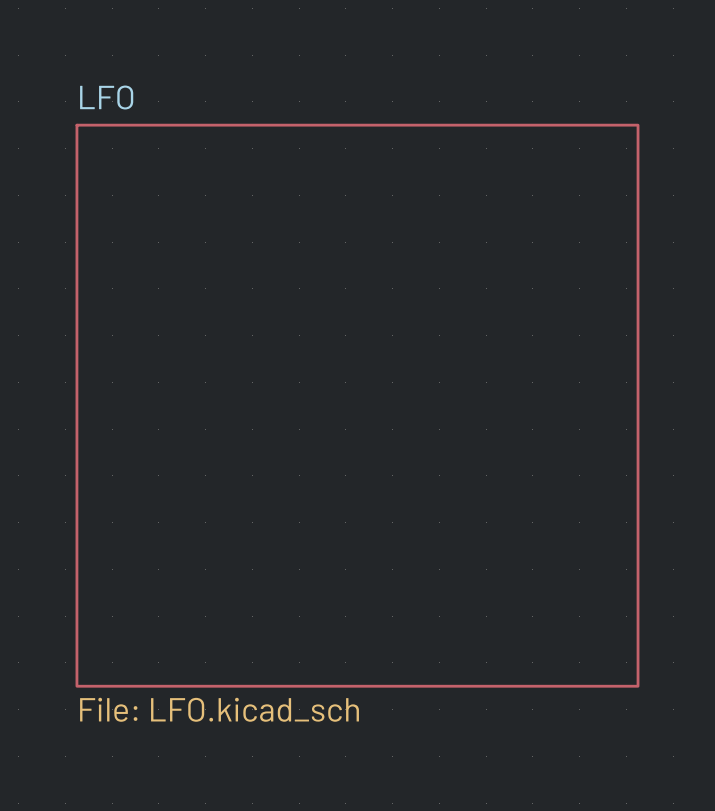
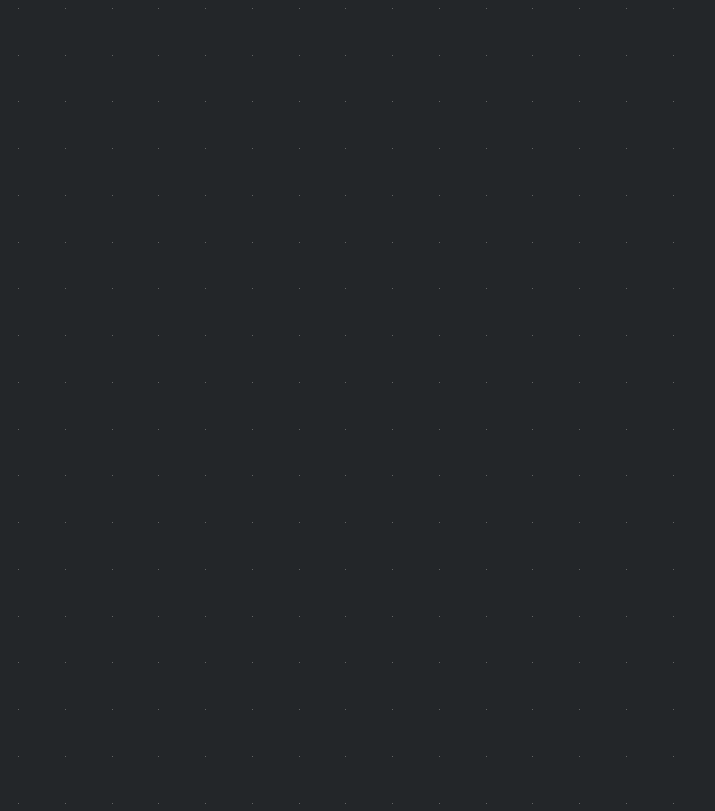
sheet LFO: File: LFO.kicad_sch (357, 405) -> none

